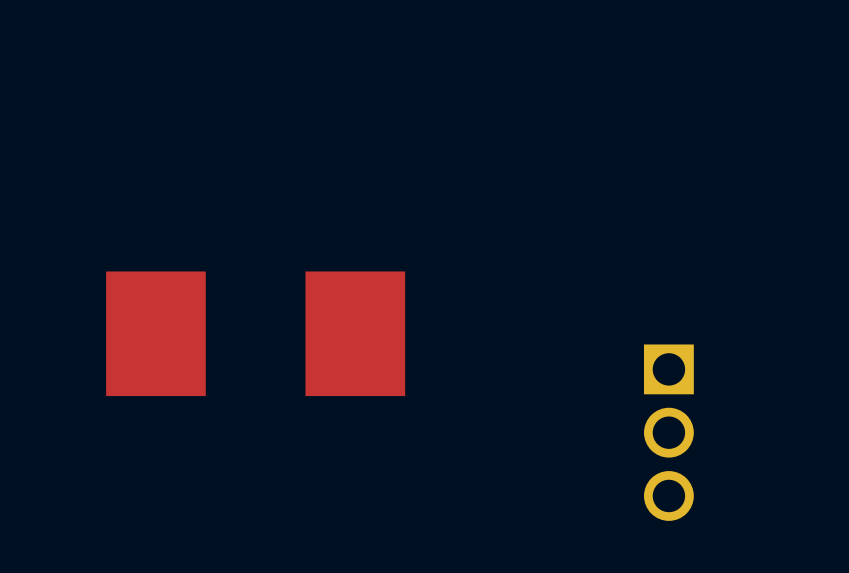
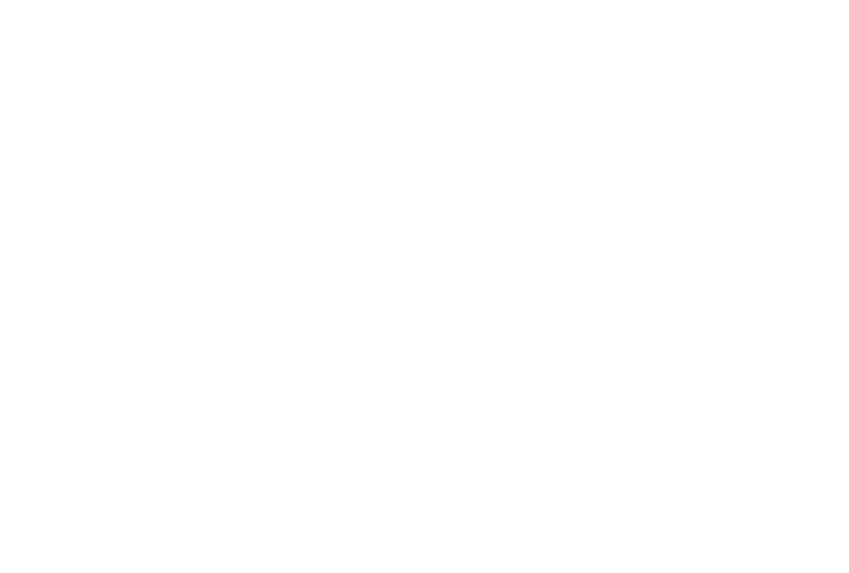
part: (255, 333) -> none
part: (668, 432) -> none

